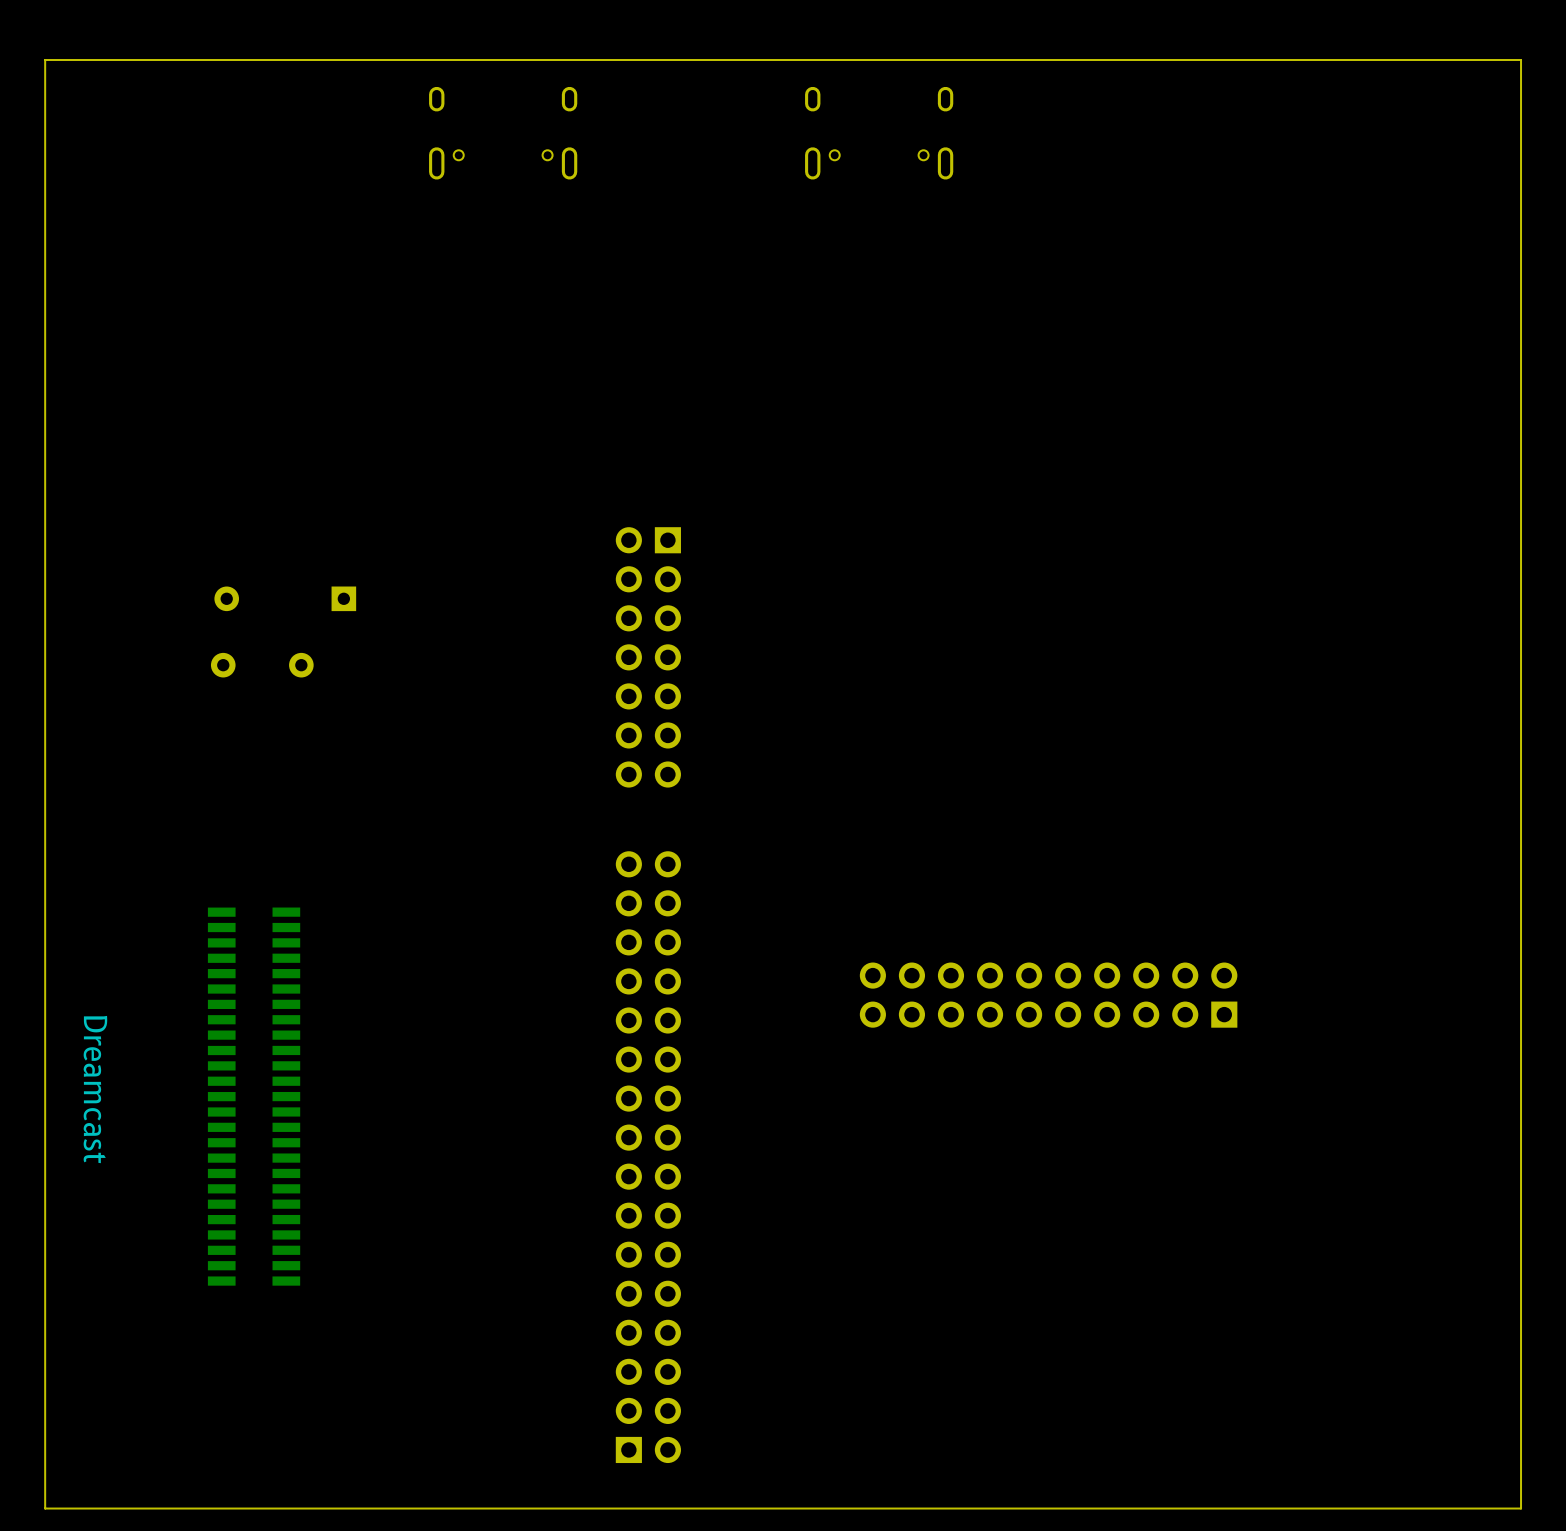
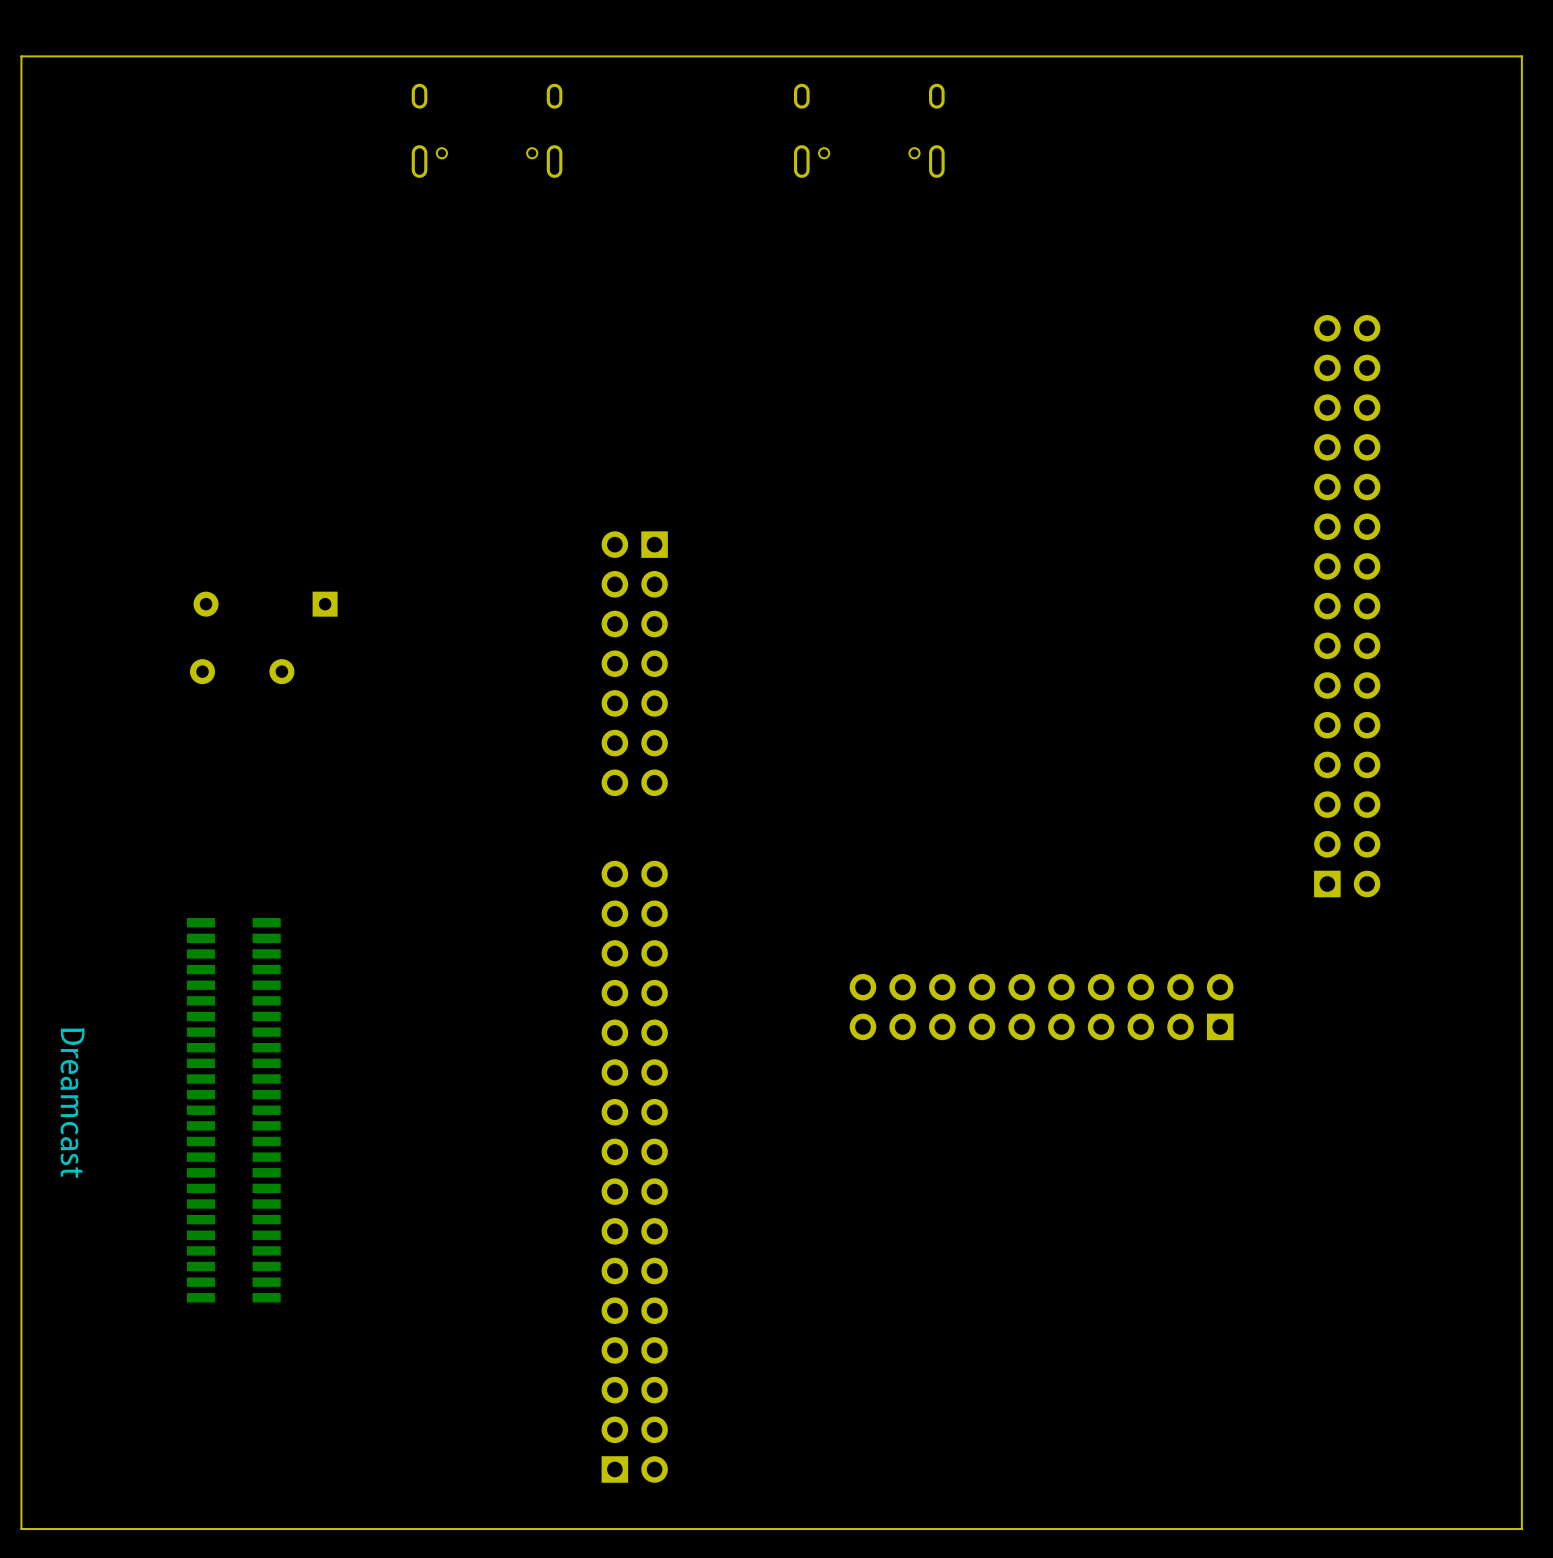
part: none -> (1347, 606)

